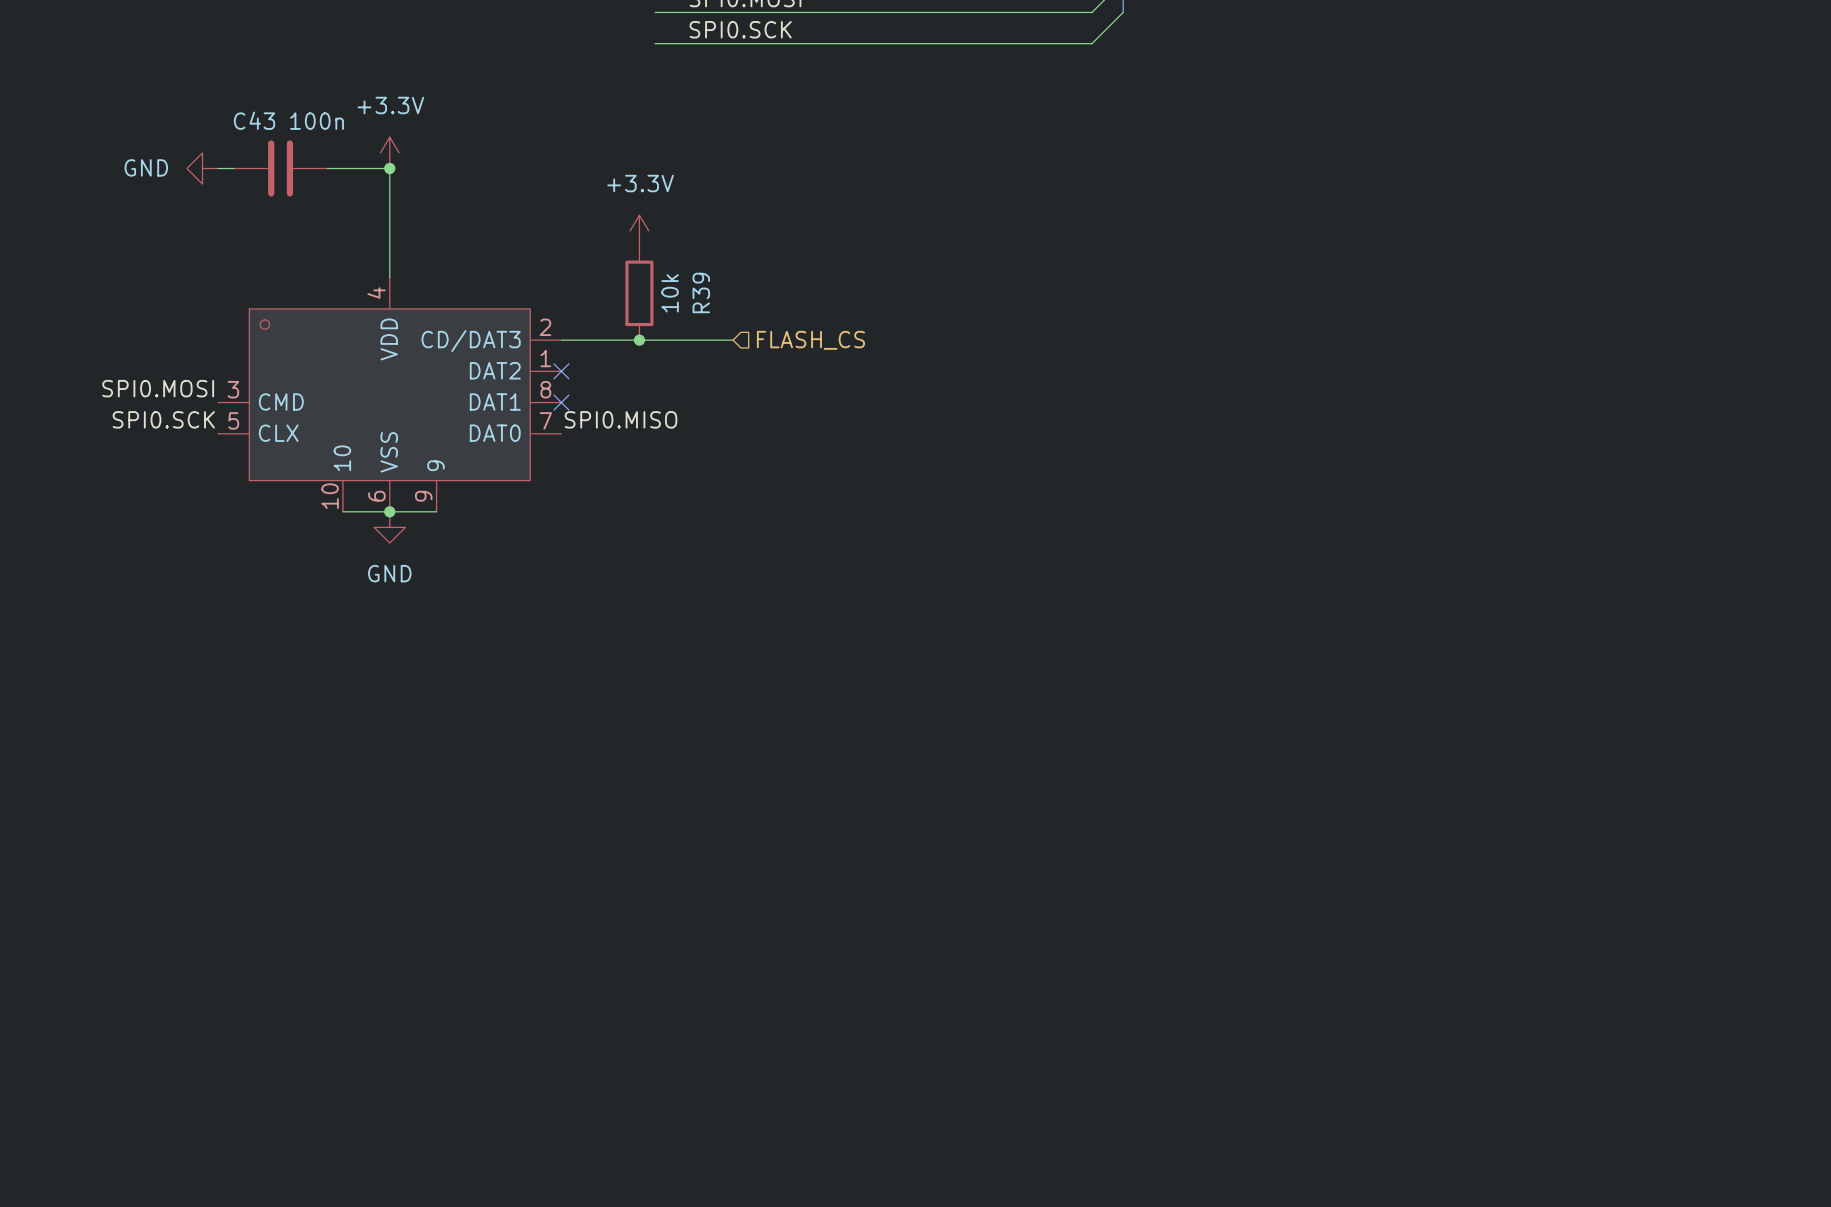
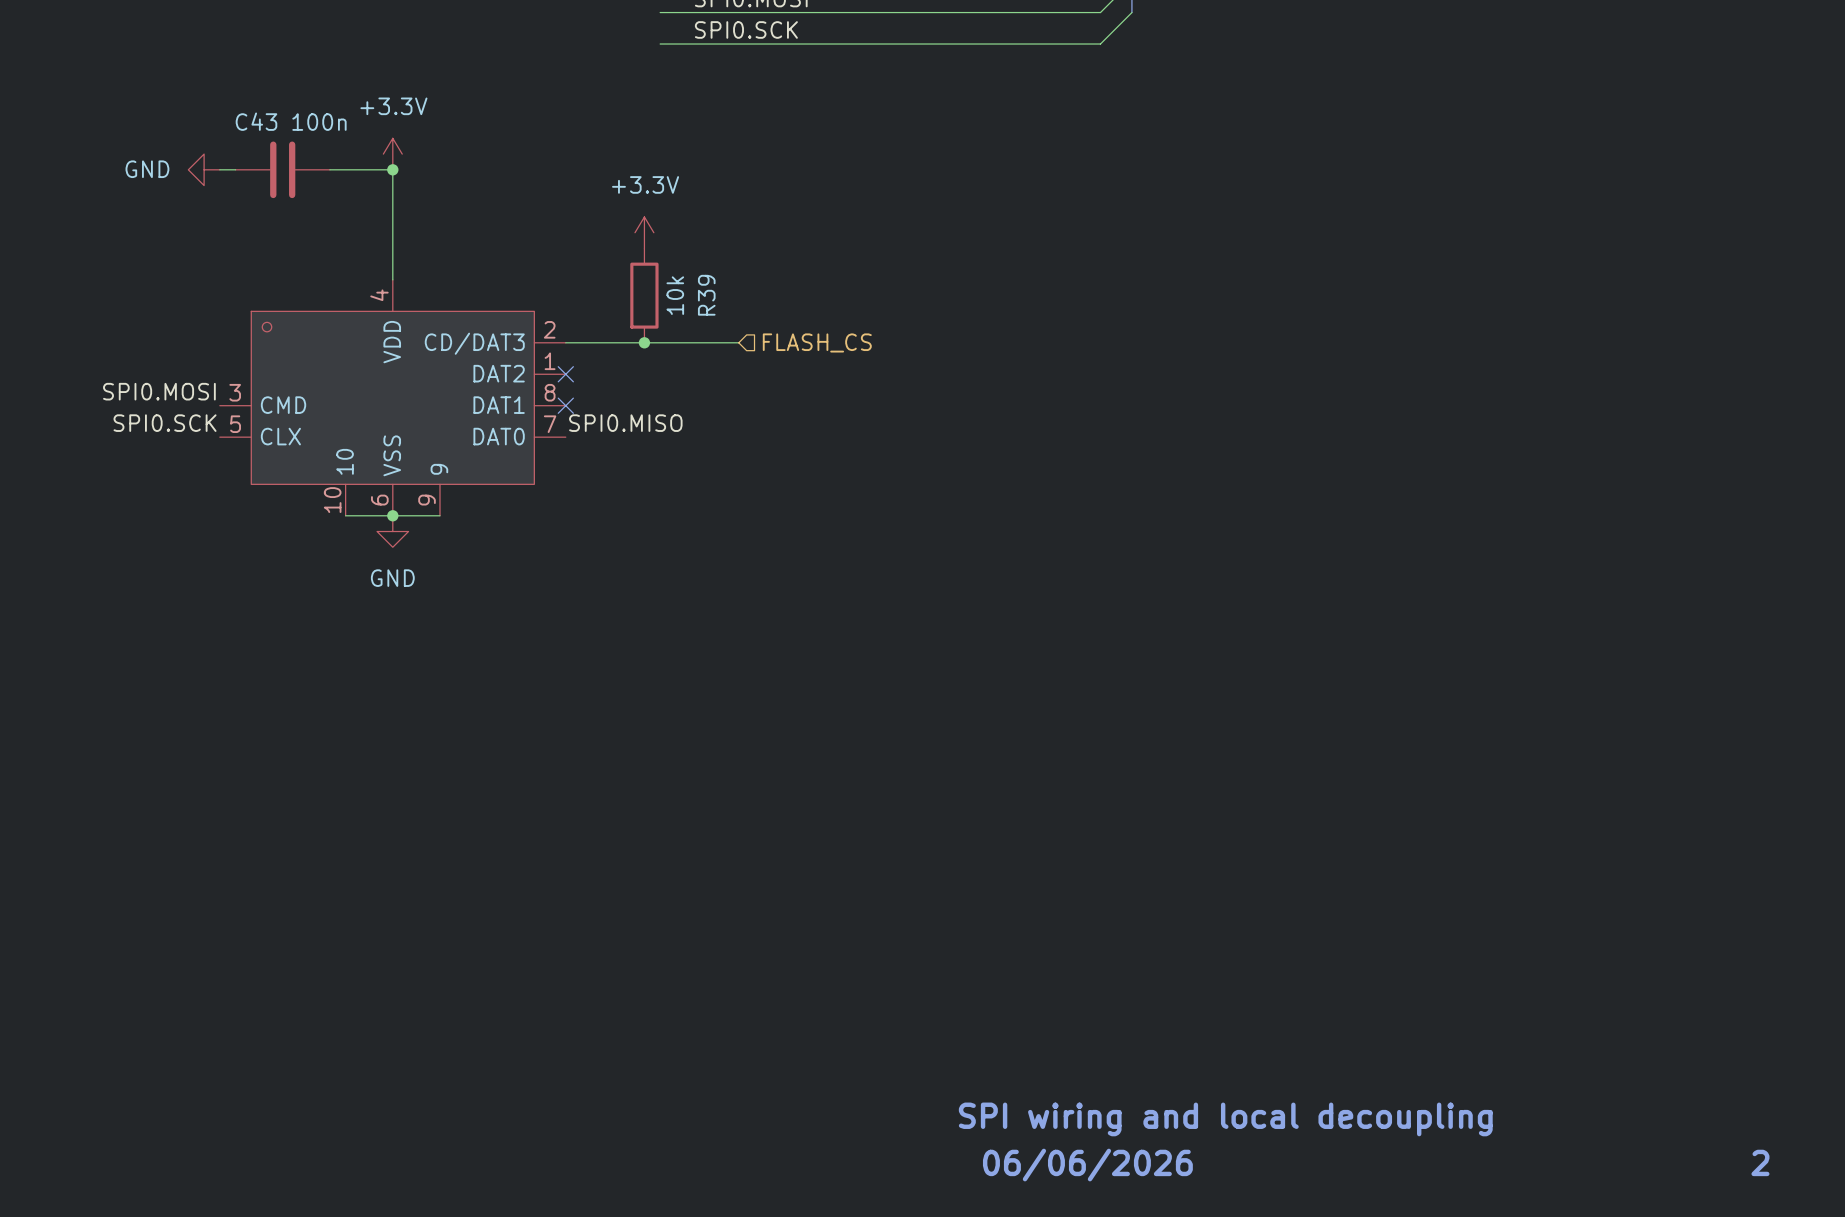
text: none -> SPI wiring and local decoupling (1225, 1119)
text: none -> 2 (1760, 1162)
text: none -> 06/06/2026 (1087, 1165)

